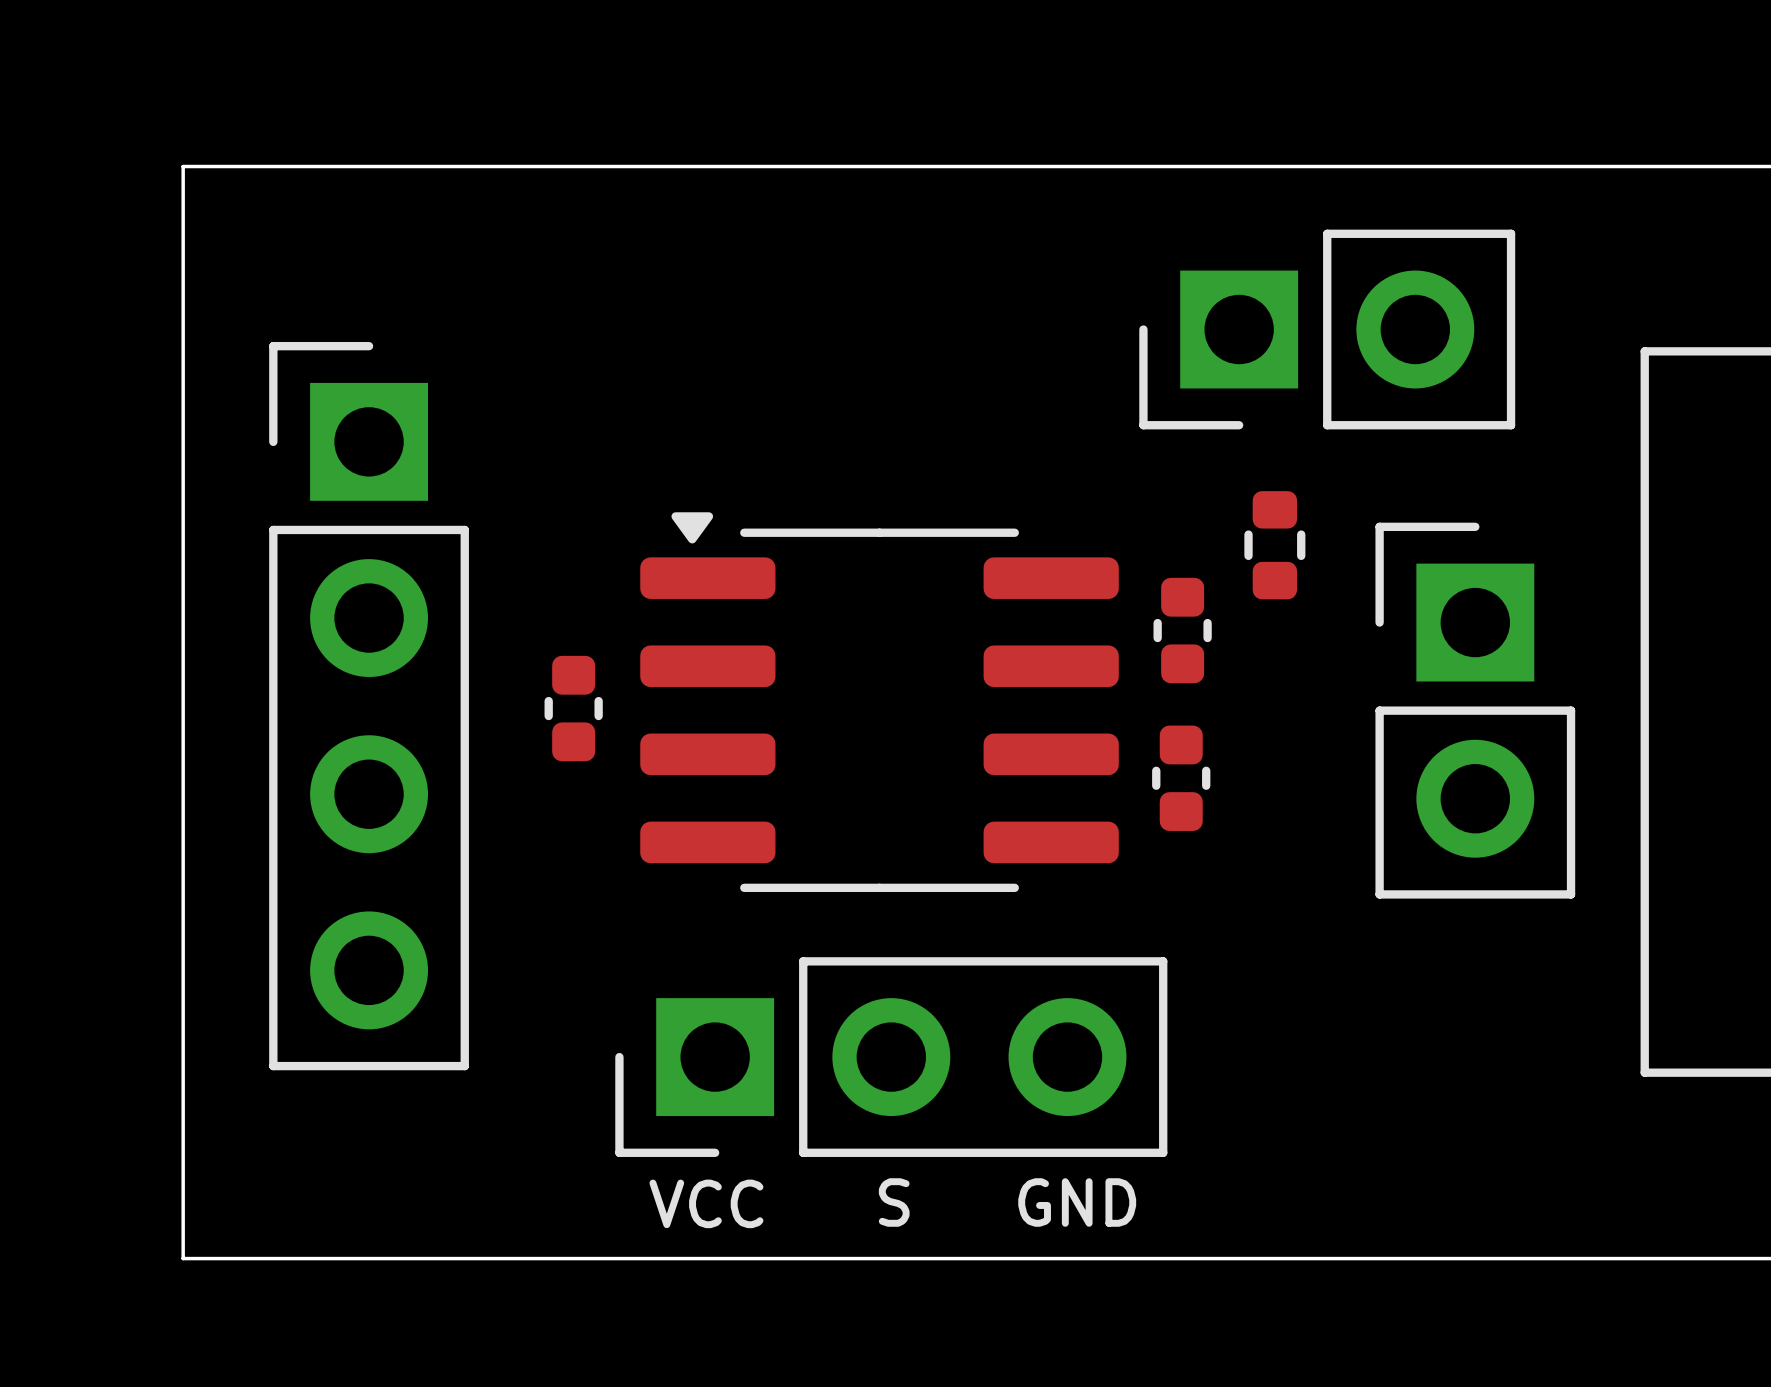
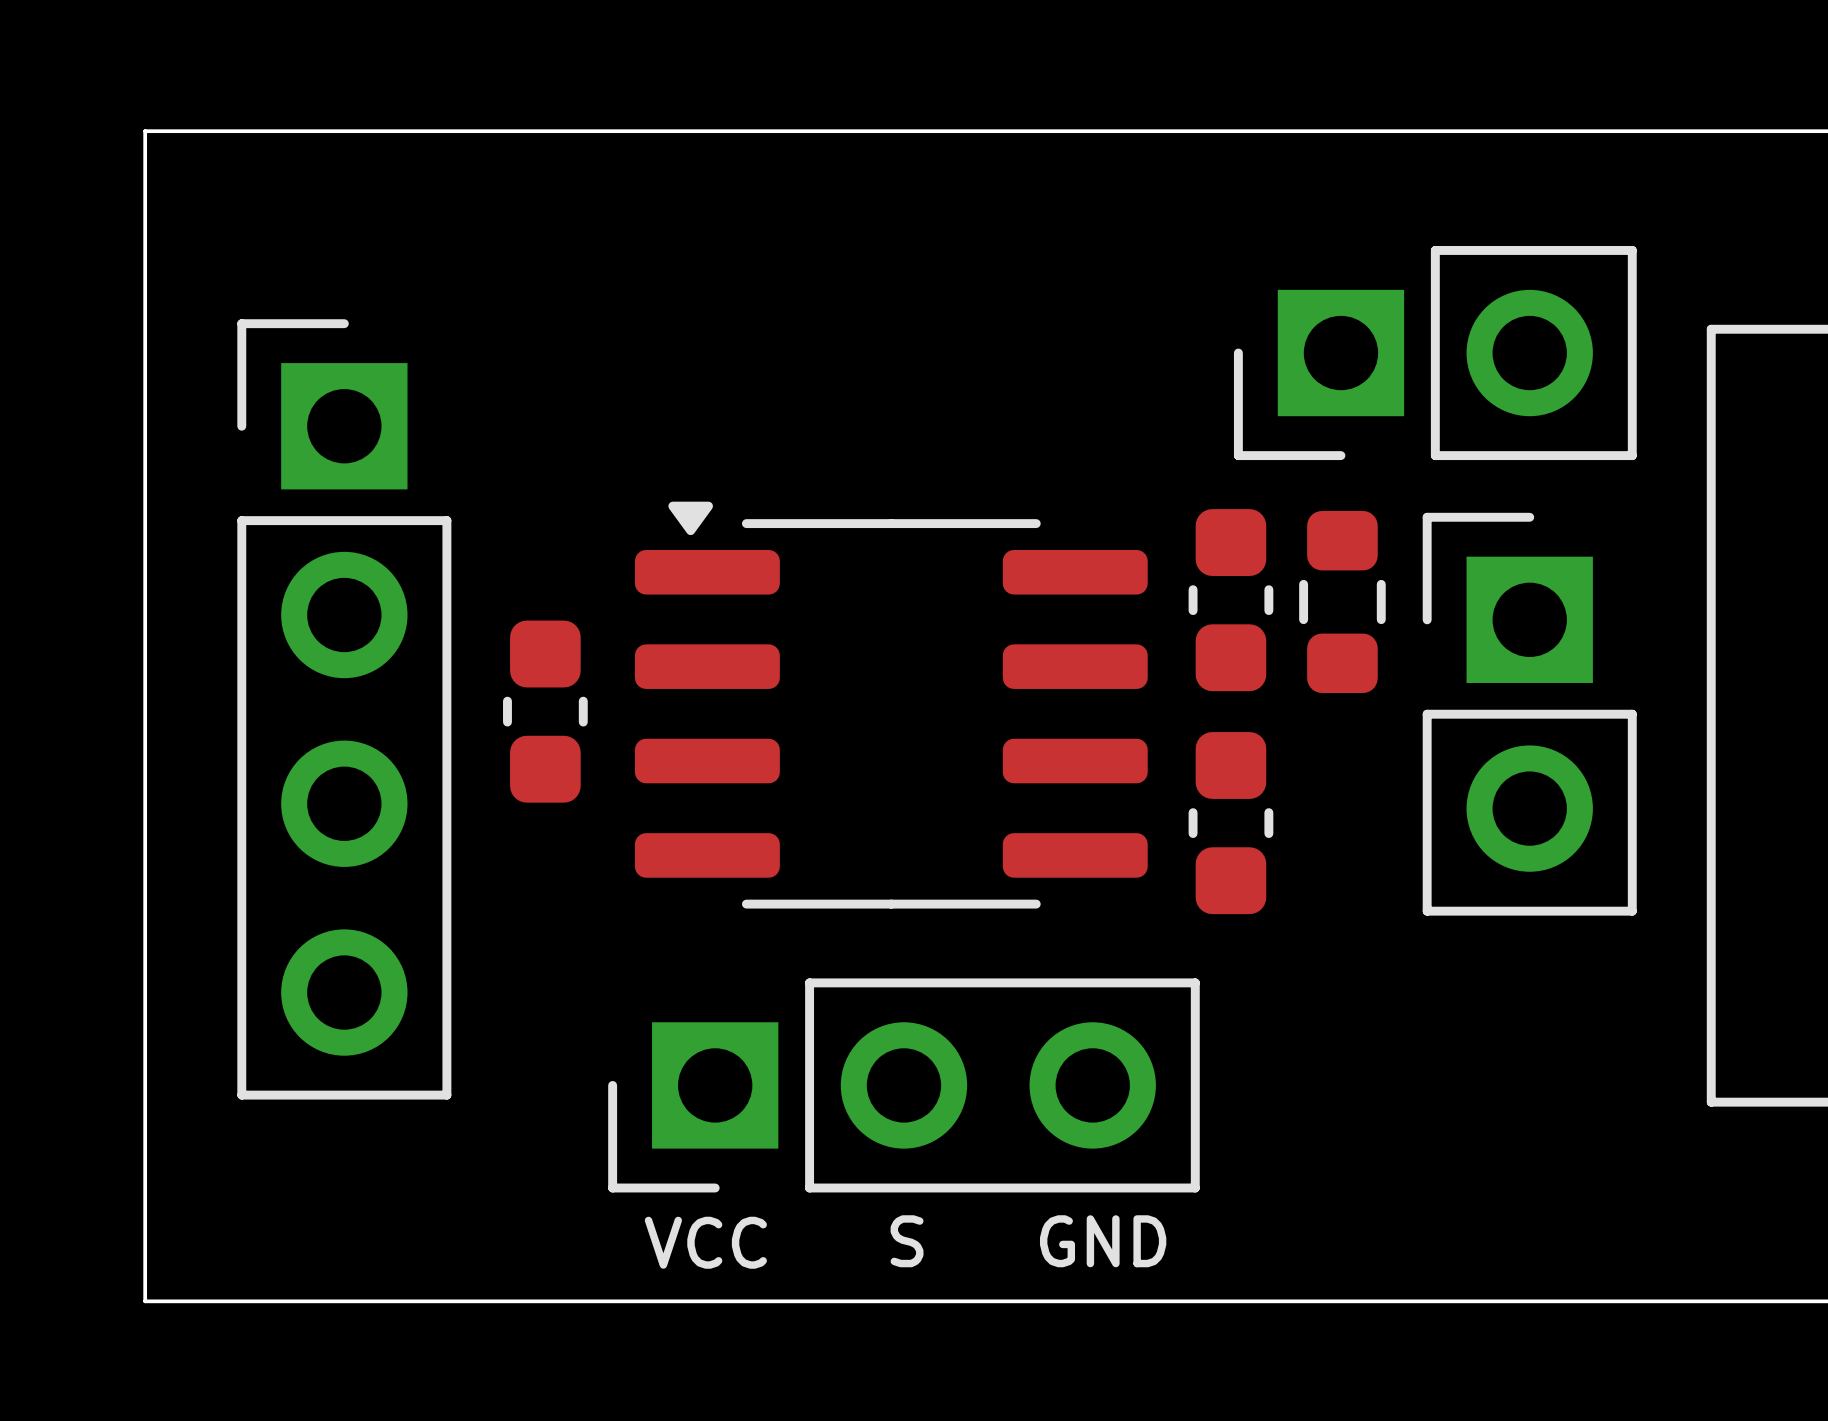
part position: (1327, 329) -> (1435, 353)
part: (1274, 545) -> none
part footprint: [1153, 577, 1212, 684] -> [1188, 509, 1274, 692]
part: none -> (1342, 601)
part footprint: [544, 655, 603, 762] -> [503, 620, 588, 803]
part footprint: [1152, 725, 1211, 831] -> [1188, 732, 1274, 915]

